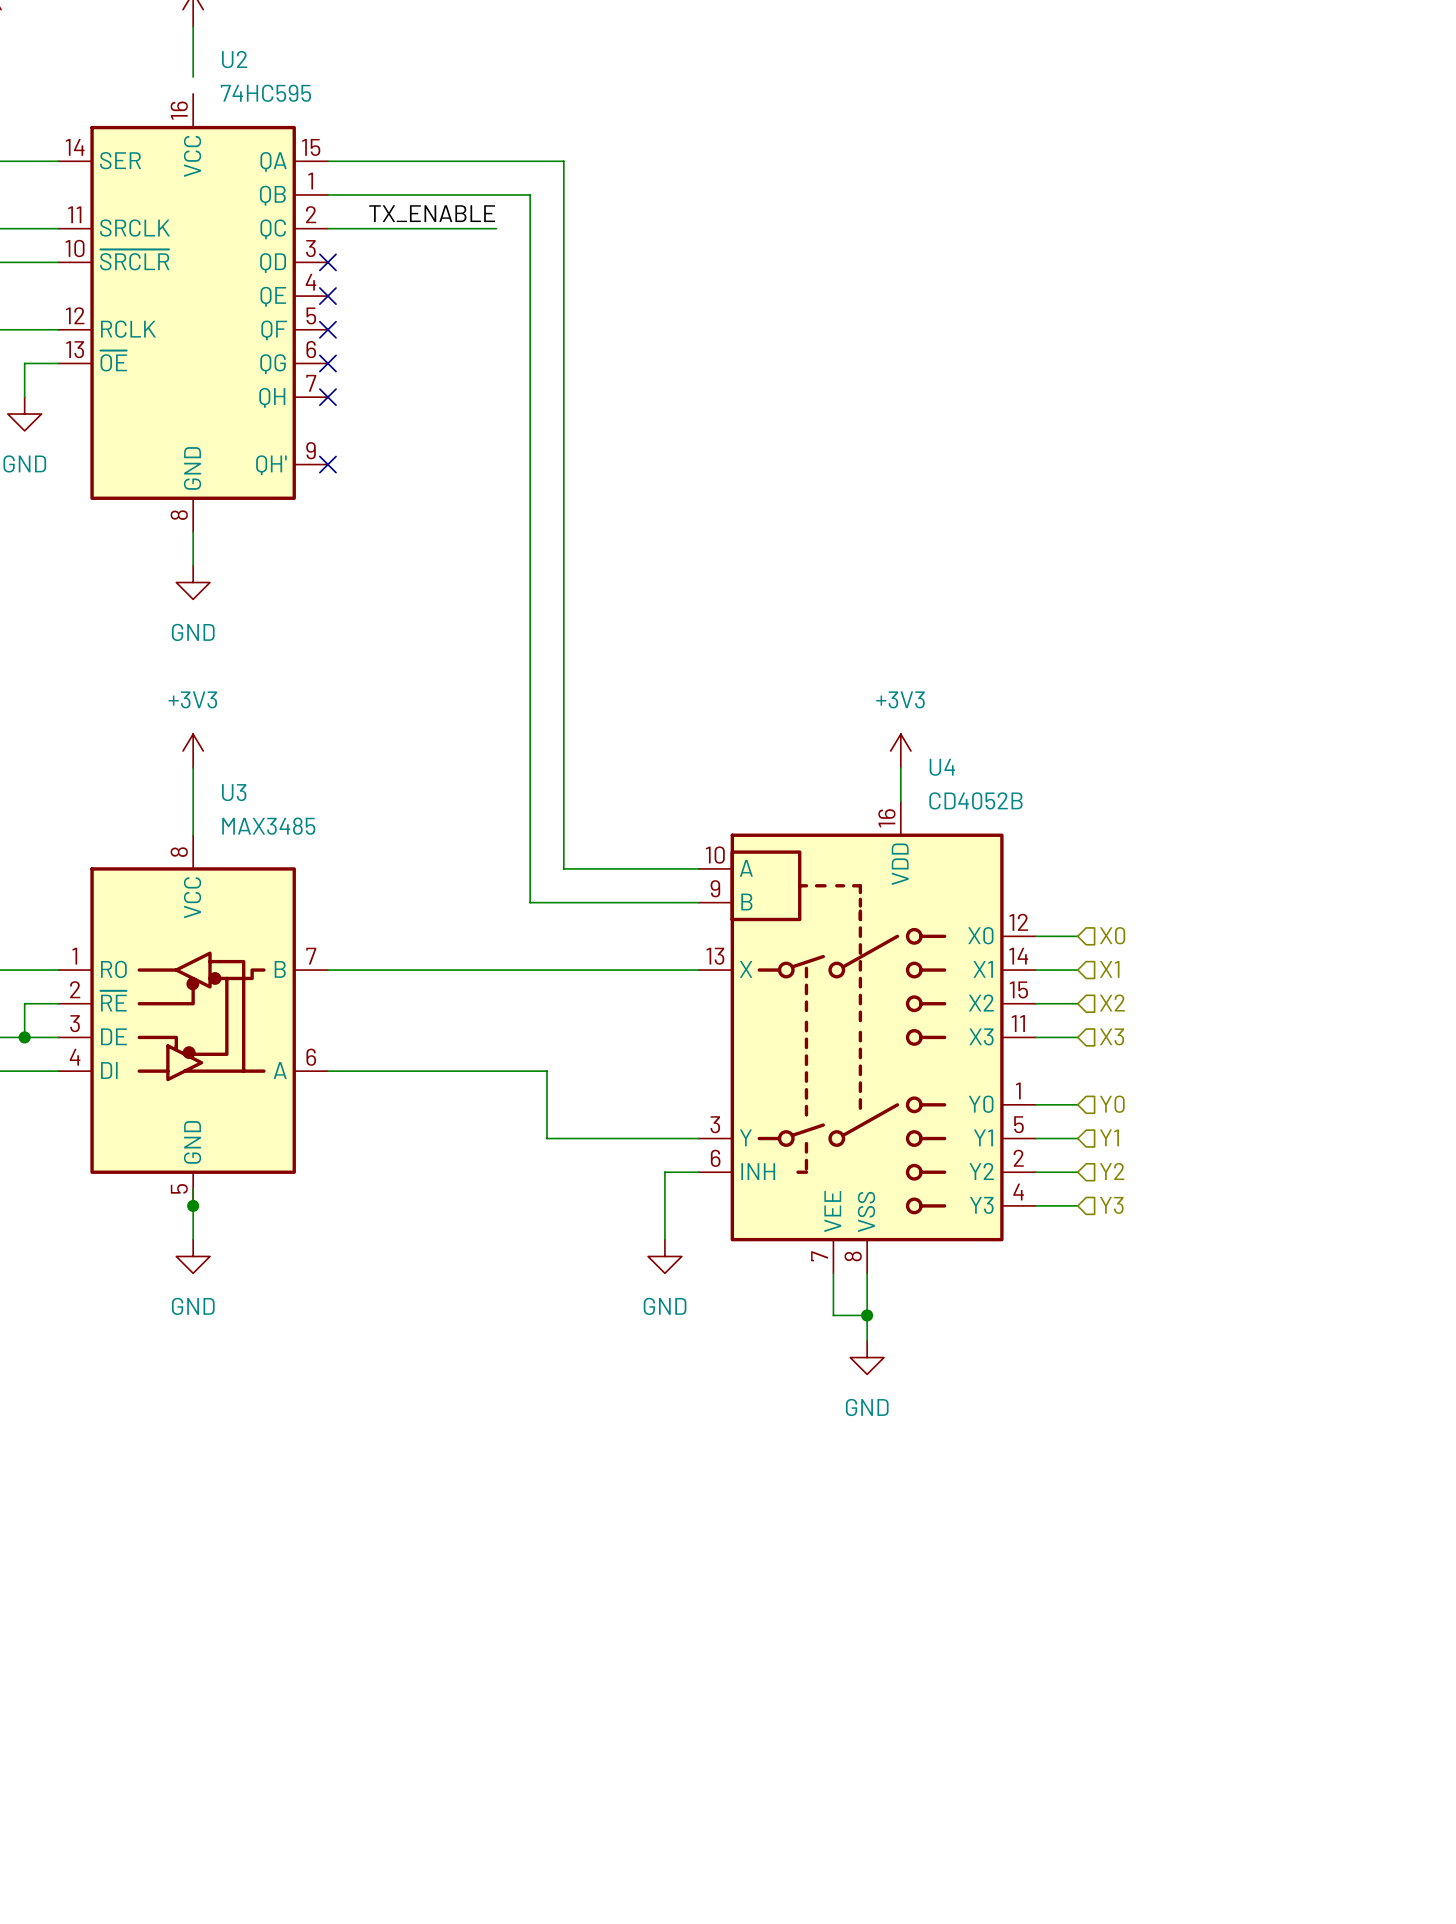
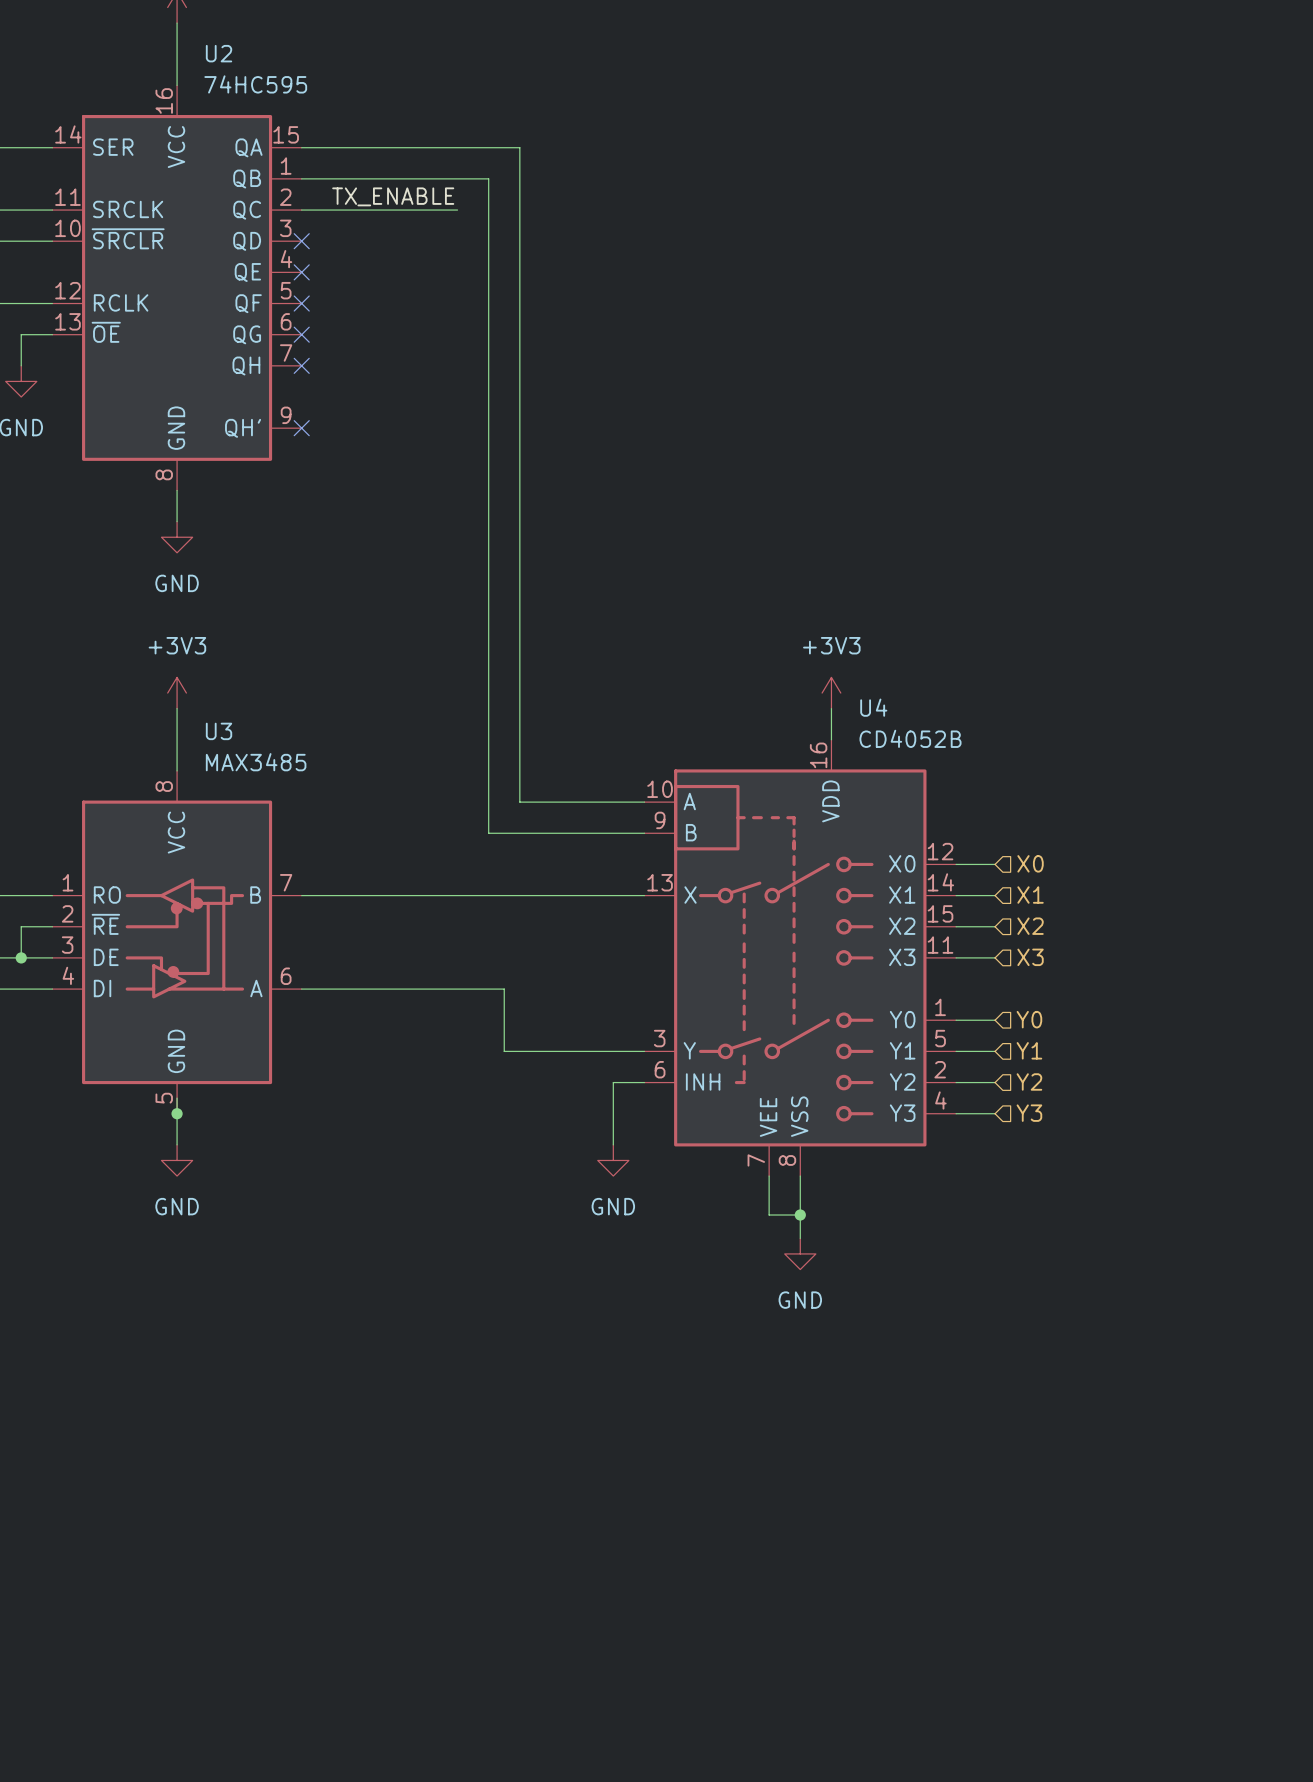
wire: none -> (177, 69) (177, 85)

